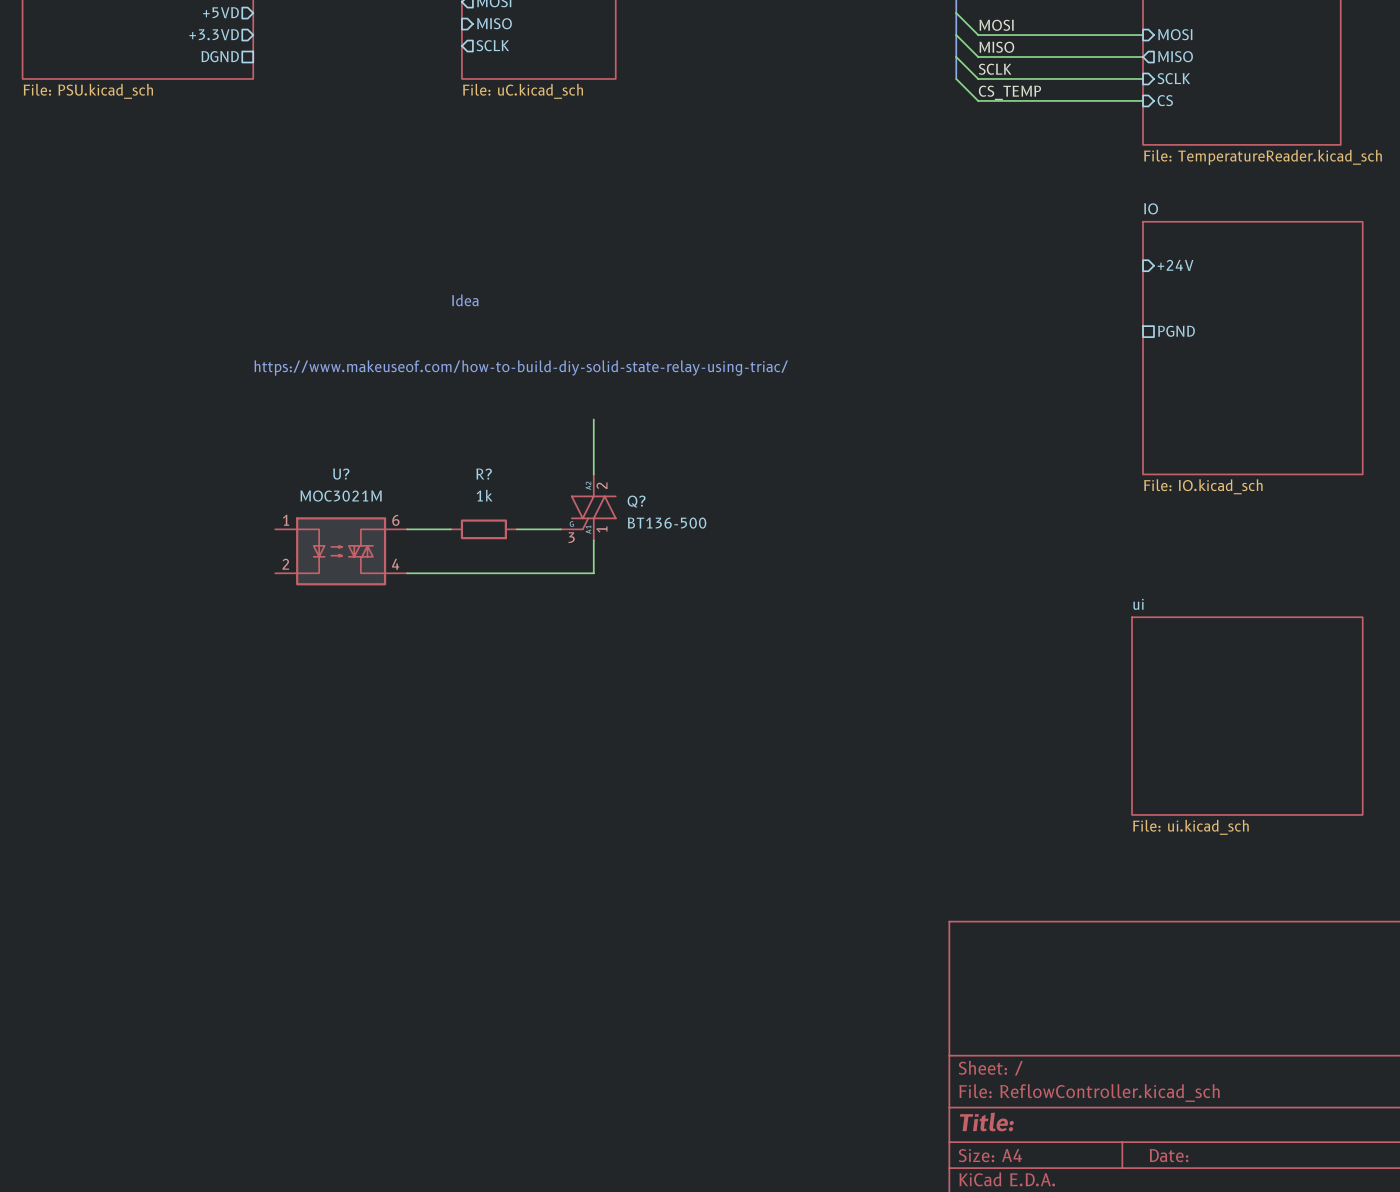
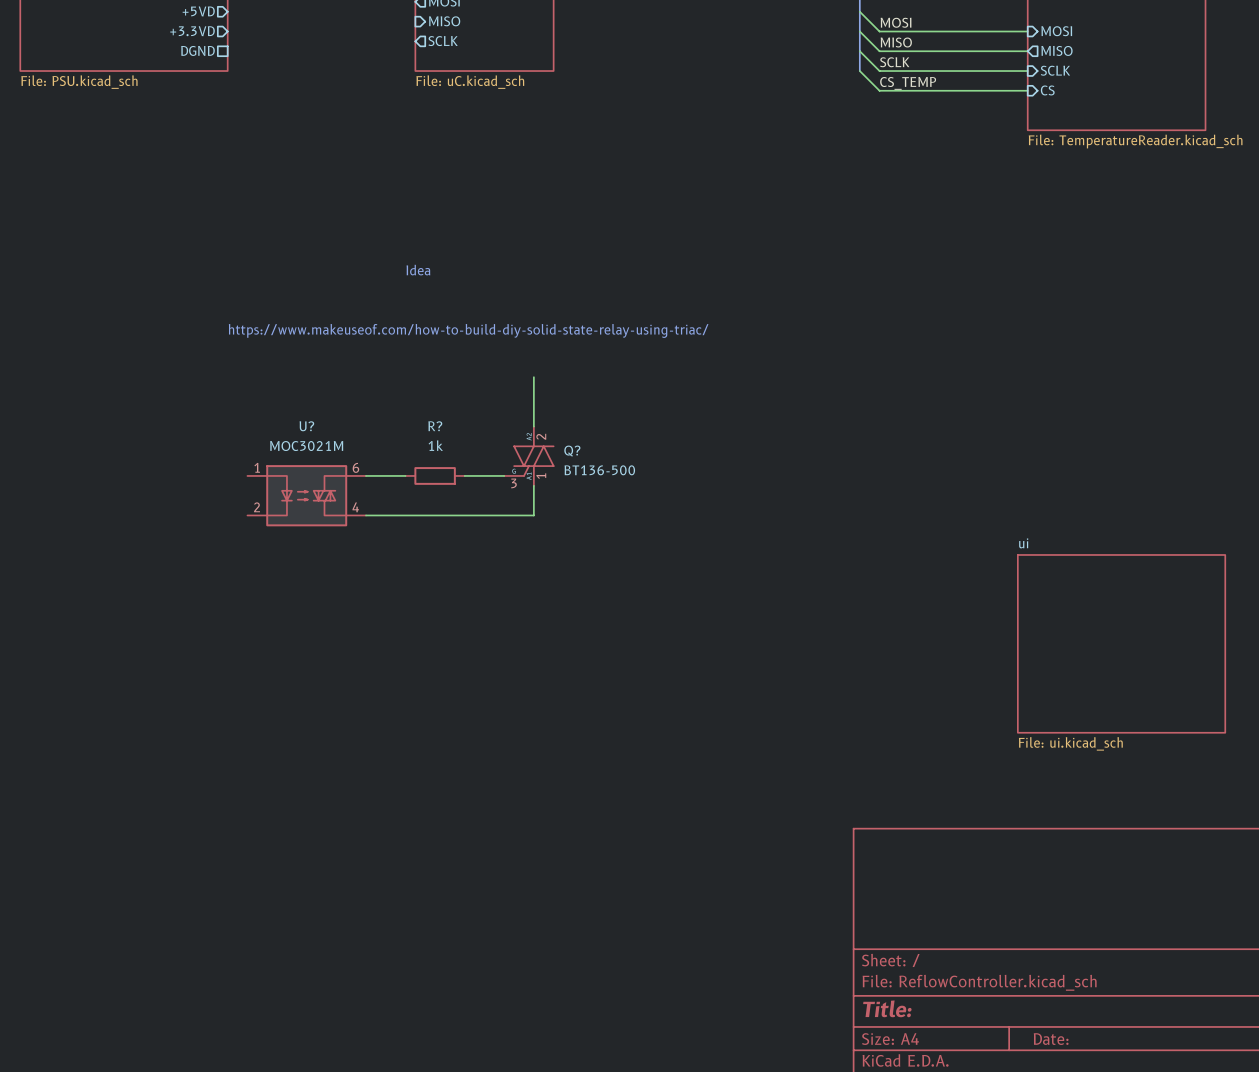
sheet pin: +24V (1175, 265) -> none
sheet pin: PGND (1176, 331) -> none
sheet IO: File: IO.kicad_sch (1252, 348) -> none

